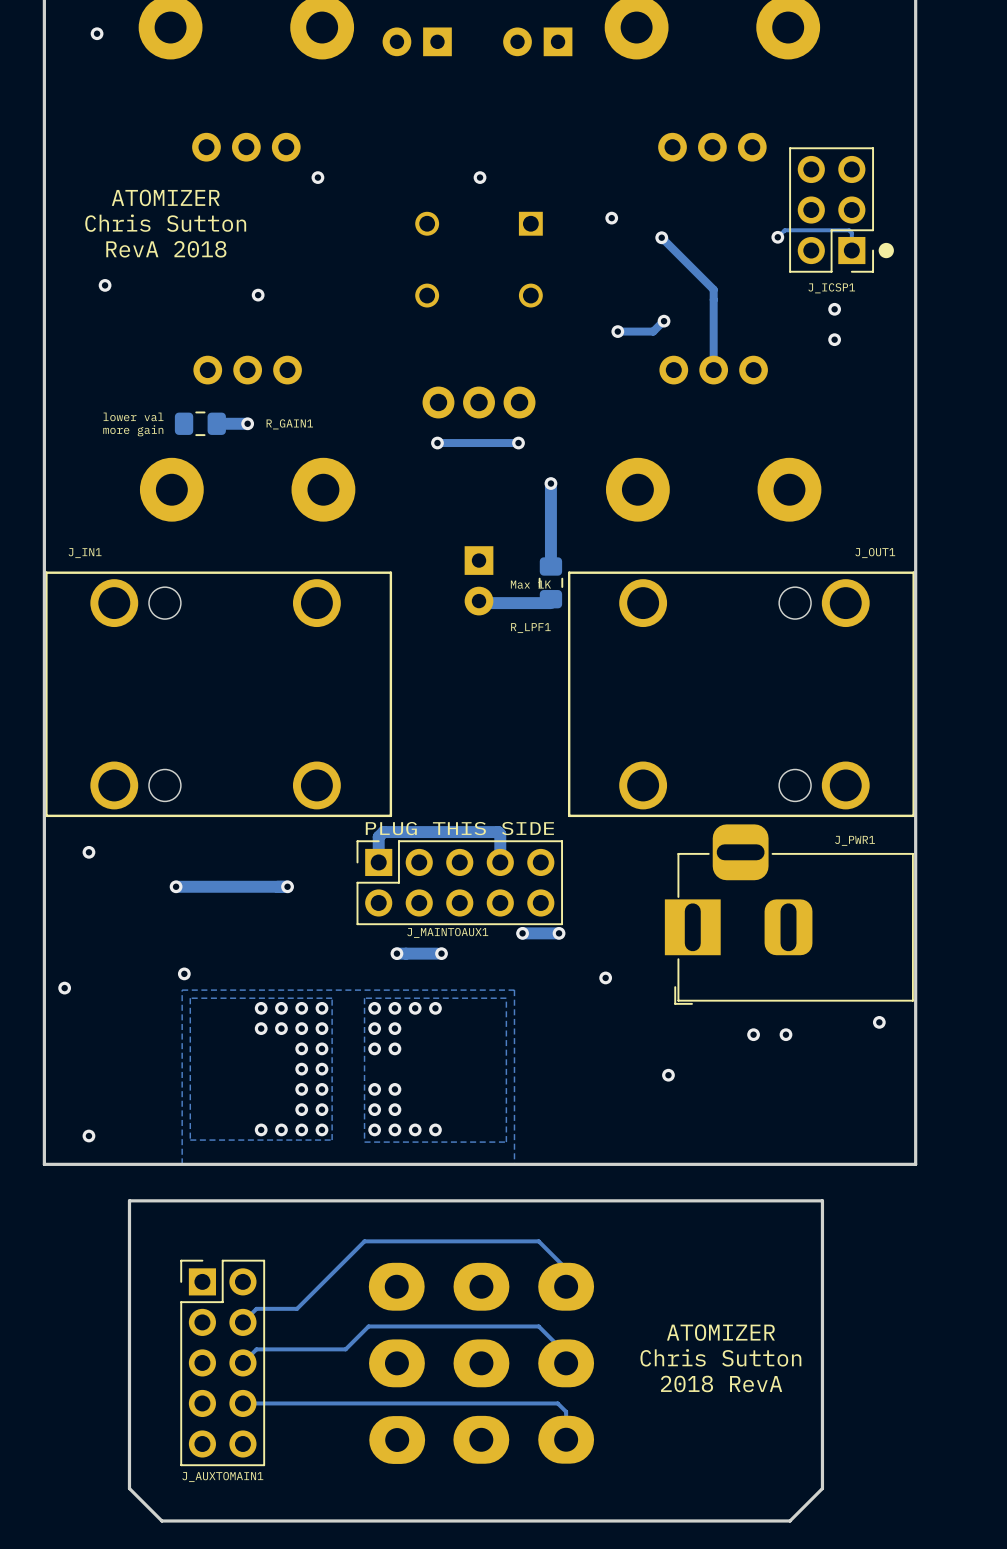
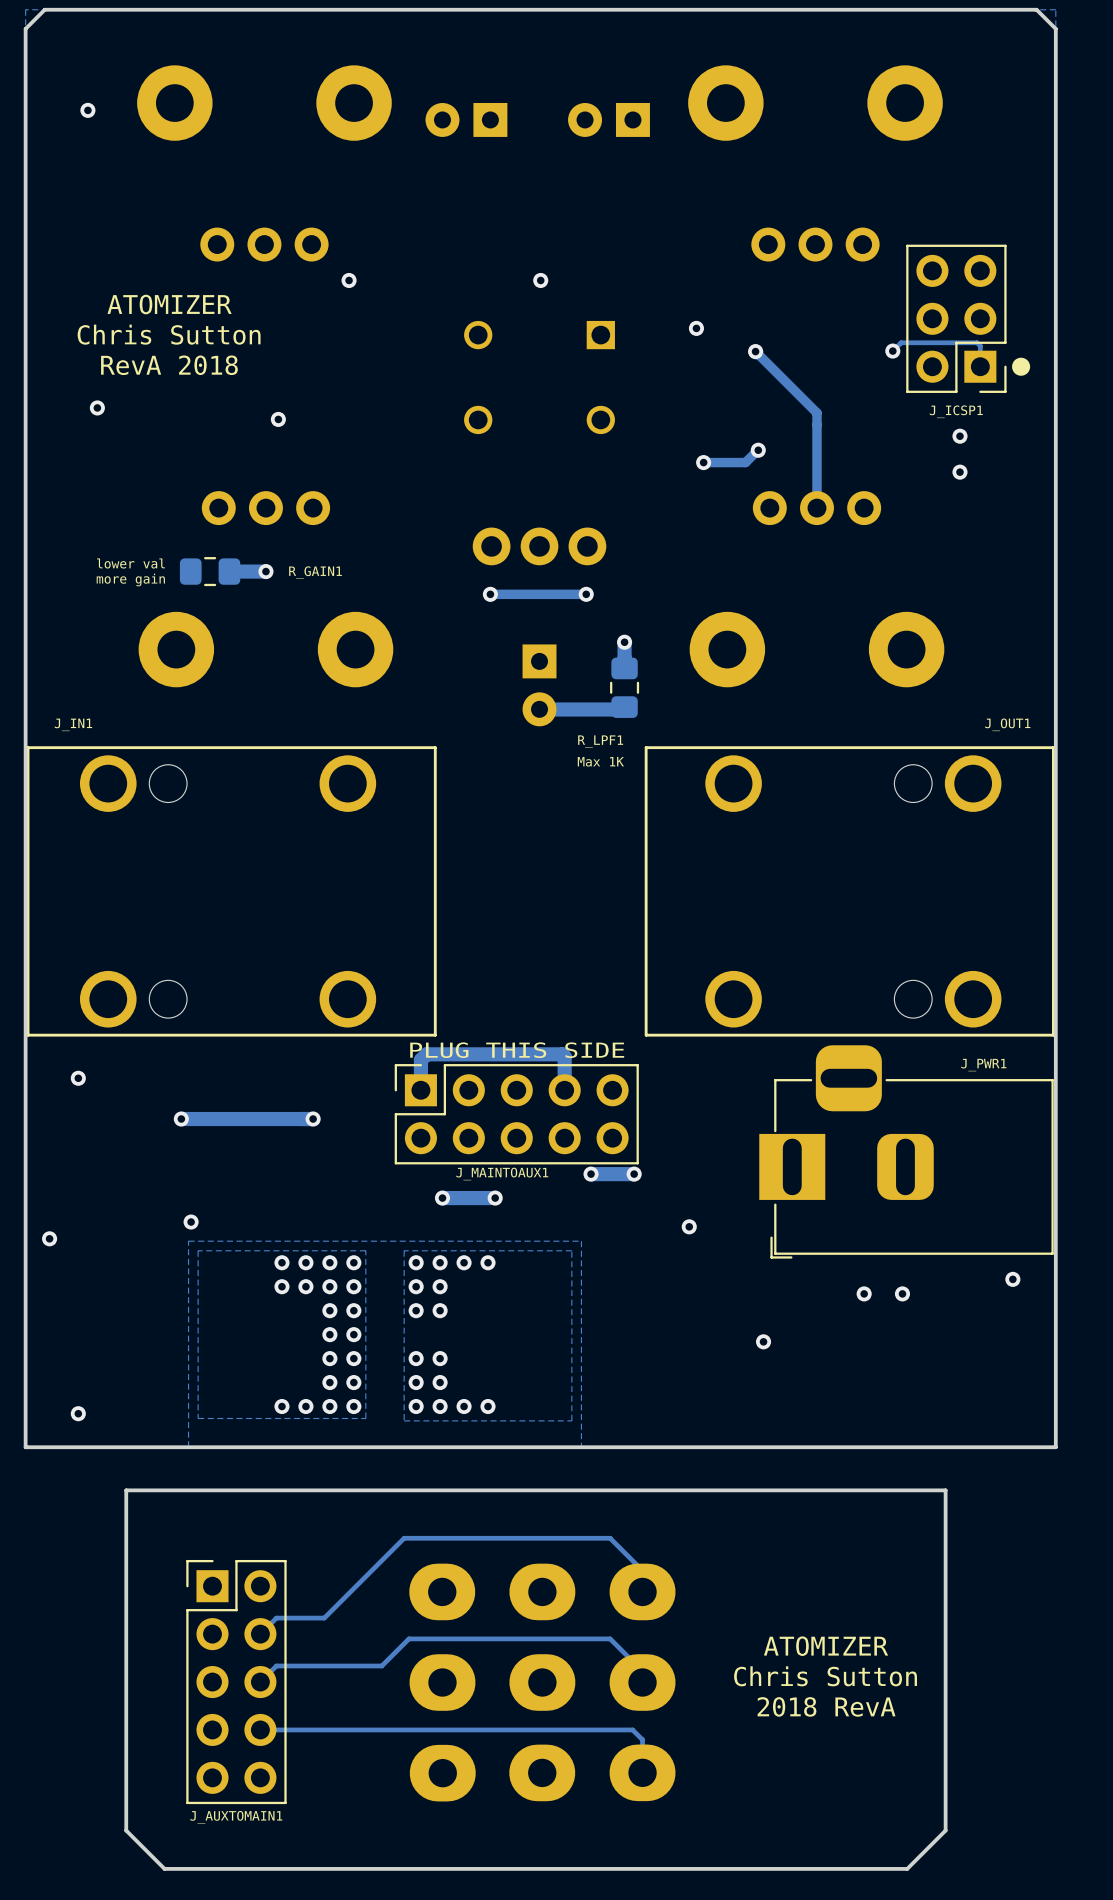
track: (550, 507) (550, 562) -> none
part position: (479, 580) -> (539, 685)
R_LPF1 position: (550, 582) -> (624, 687)
track: (550, 603) (479, 603) -> (624, 709) (539, 709)

